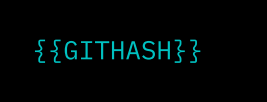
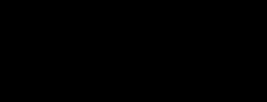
text: {{GITHASH}} (117, 51) -> none

